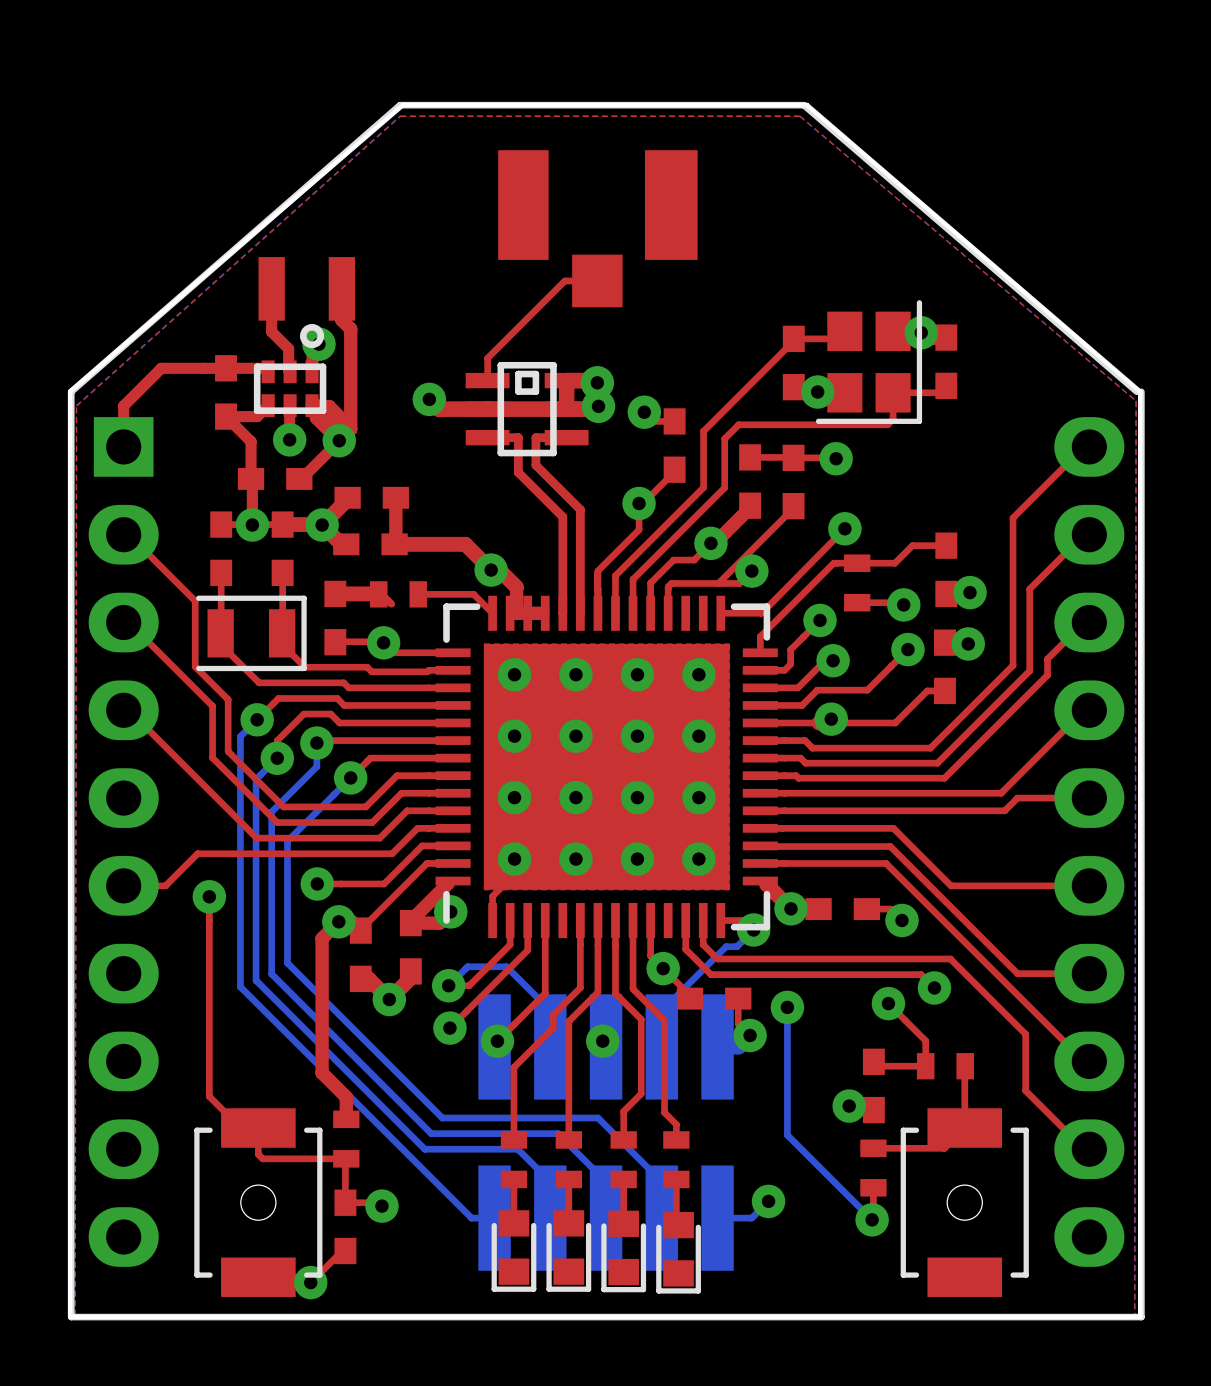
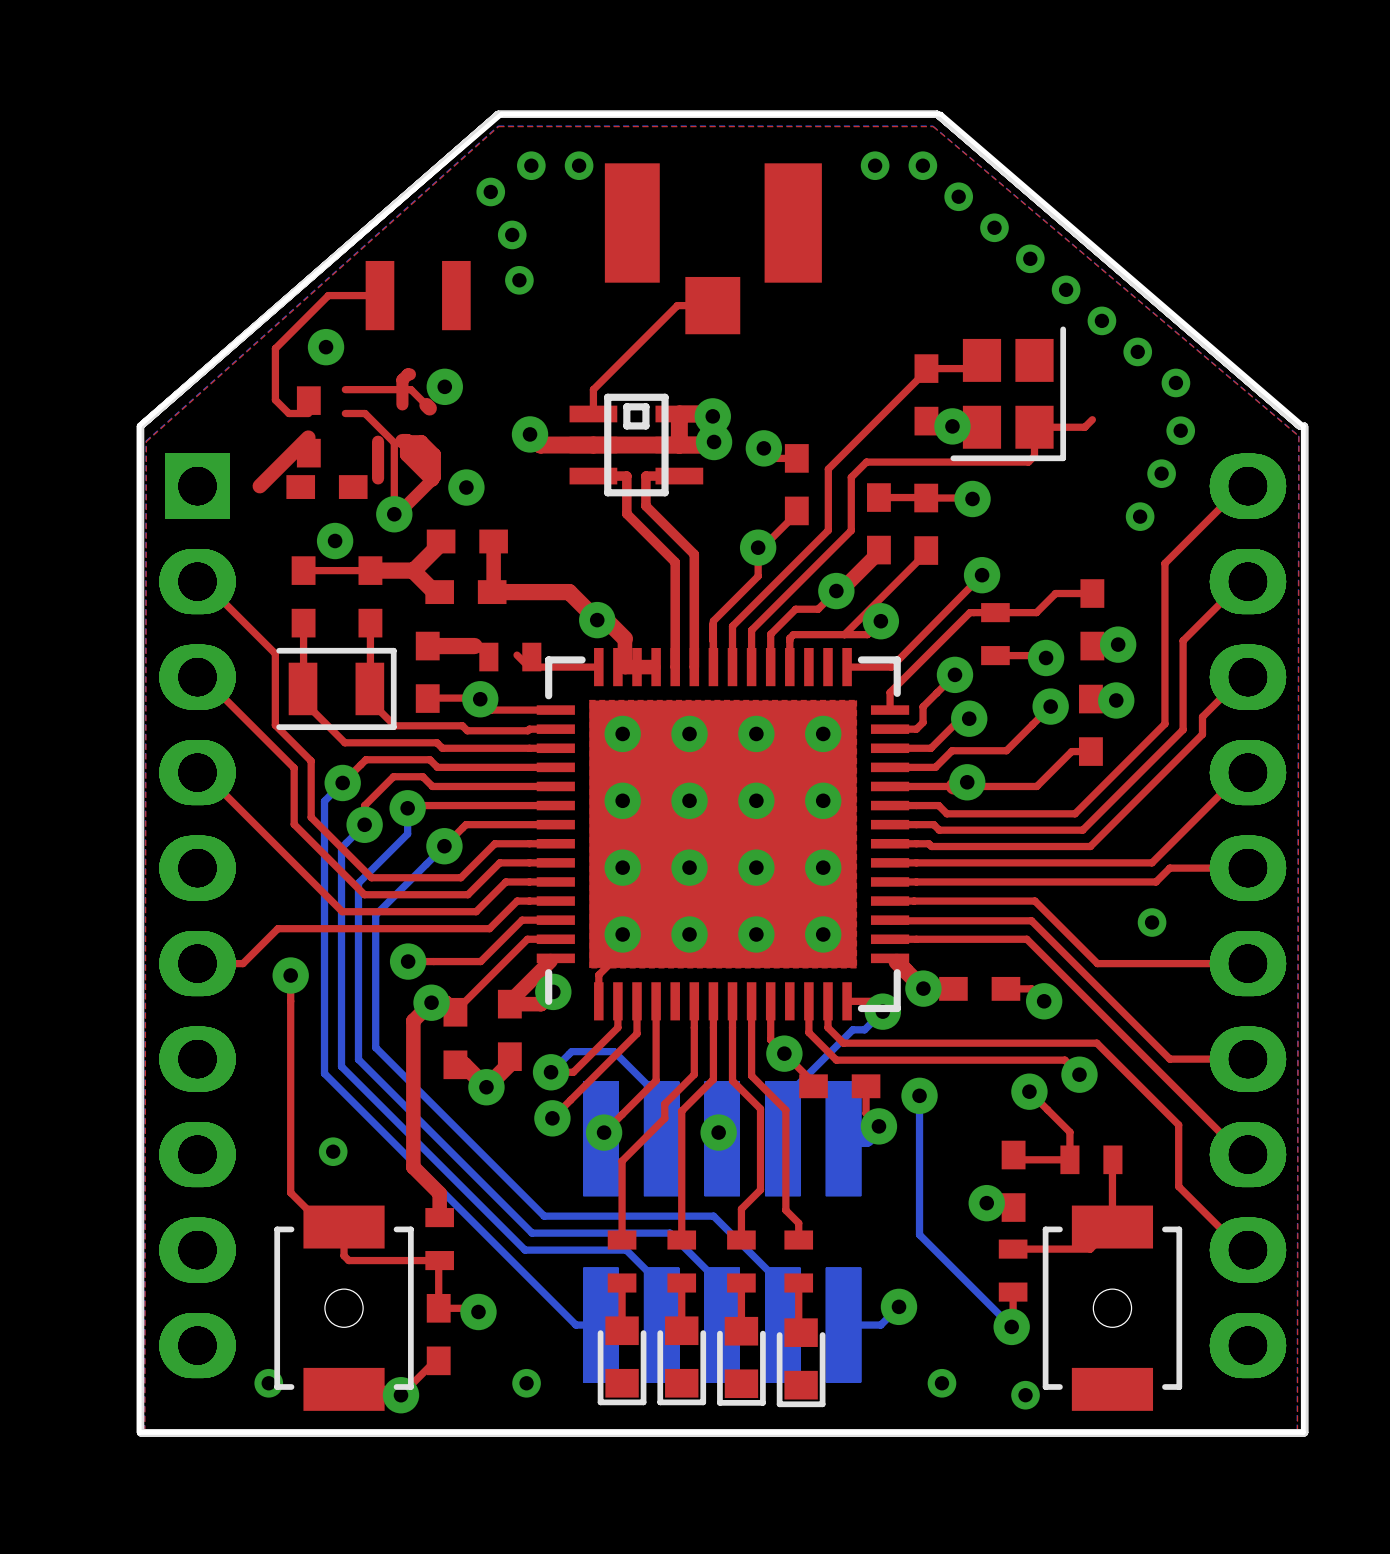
part: none -> (531, 165)
part: none -> (579, 165)
part: none -> (875, 165)
part: none -> (922, 165)
part: none -> (490, 191)
part: none -> (958, 196)
part: none -> (994, 227)
part: none -> (512, 234)
part: none -> (1030, 258)
part: none -> (519, 280)
part: none -> (1066, 289)
top track: none -> (379, 295) (328, 295) (275, 348) (275, 400) (288, 413) (308, 413)
top track: (271, 288) (271, 331) (288, 348) (290, 371) -> none
part position: (306, 288) -> (418, 295)
part: none -> (1101, 320)
top track: (341, 307) (341, 288) (341, 320) (350, 328) (350, 429) (339, 440) -> none
via: none -> (326, 347)
part: none -> (1137, 351)
via: (921, 332) -> none
via position: (318, 344) -> (444, 386)
part: none -> (1175, 382)
top track: none -> (345, 389) (411, 389) (429, 408) (426, 405)
part: (946, 361) -> none
part: (290, 370) -> none
top track: (268, 371) (264, 368) (161, 368) (123, 405) (123, 446) -> none
top track: none -> (345, 413) (365, 413) (394, 442) (394, 514)
part: none -> (1180, 430)
top track: none -> (308, 437) (259, 486)
top track: (268, 405) (257, 416) (226, 416) (251, 441) (252, 525) -> none
part: none -> (1161, 473)
via position: (289, 439) -> (394, 514)
via position: (339, 440) -> (466, 487)
part: none -> (1140, 516)
part position: (275, 478) -> (326, 487)
via position: (252, 525) -> (335, 541)
via: (322, 525) -> none
part position: (398, 594) -> (510, 657)
top track: (418, 594) (473, 594) (492, 613) -> (517, 655) (529, 667) (598, 667)
part: none -> (722, 773)
part: none -> (1152, 922)
part: none -> (333, 1151)
part: none -> (268, 1383)
part: none -> (526, 1383)
part: none -> (941, 1383)
part: none -> (1025, 1395)

